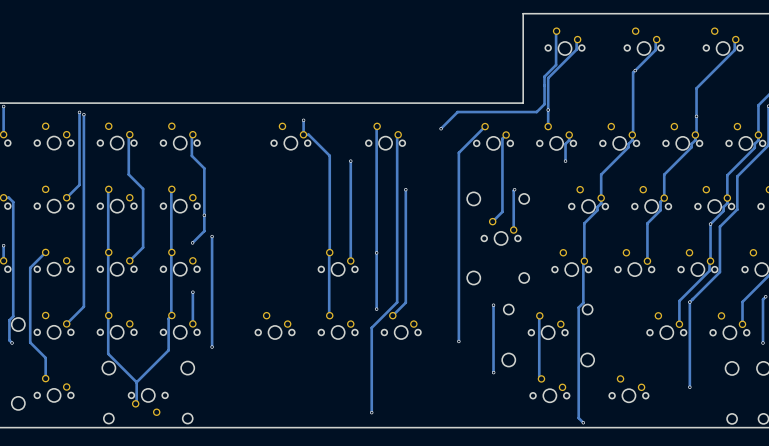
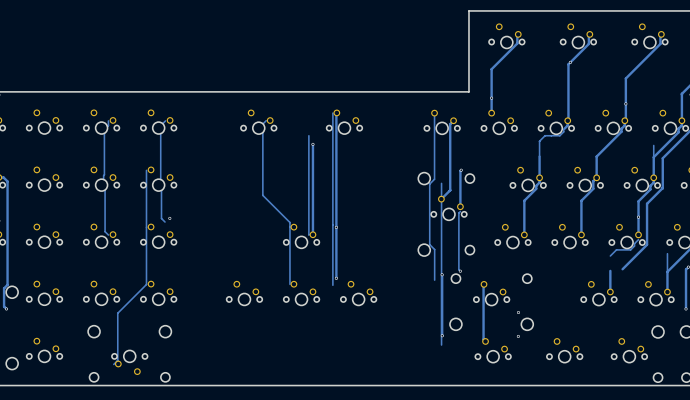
track: (556, 31) (556, 65) (544, 76) (544, 104) (536, 112) (457, 112) (441, 128) -> none
track: (79, 112) (79, 184) (66, 197) -> none
via: (79, 112) -> none
track: (83, 114) (83, 306) (66, 323) -> none
via: (83, 114) -> none
track: (303, 120) (303, 134) (308, 134) (329, 155) (329, 315) -> none
via: (303, 120) -> none
track: none -> (332, 113) (332, 285)
track: (485, 126) (458, 152) (458, 341) -> (434, 113) (434, 179) (429, 184) (429, 244) (434, 249) (434, 280)
via: (441, 128) -> none
track: (129, 134) (128, 174) (143, 188) (143, 247) (129, 260) -> none
track: (192, 134) (191, 155) (204, 168) (204, 231) (192, 242) -> none
track: none -> (266, 120) (262, 124) (262, 195) (289, 222) (289, 284)
track: (398, 134) (397, 302) (371, 327) (371, 412) -> none
track: none -> (108, 120) (108, 125) (104, 129) (103, 175) (105, 231) (108, 235)
track: none -> (165, 120) (162, 124) (160, 132) (161, 218) (165, 222)
track: (569, 135) (569, 140) (565, 143) (565, 161) -> none
track: (628, 143) (628, 147) (601, 174) -> (539, 141) (539, 156)
track: none -> (563, 129) (559, 135) (545, 135) (539, 141)
track: none -> (308, 135) (309, 234)
via: (565, 161) -> none
track: none -> (653, 145) (653, 157)
track: (108, 189) (108, 353) (136, 382) -> none
track: none -> (146, 170) (146, 284) (117, 313) (117, 360) (113, 364)
track: (171, 189) (171, 315) (168, 318) (168, 350) (136, 382) (135, 403) -> none
track: (405, 189) (405, 302) (392, 315) -> none
via: (405, 189) -> none
track: none -> (441, 183) (441, 345)
via: (204, 215) -> none
via position: (710, 224) -> (638, 217)
track: none -> (460, 211) (458, 213) (460, 271)
track: (212, 236) (212, 347) -> none
via: (212, 236) -> none
track: (45, 252) (30, 267) (30, 342) (45, 357) (45, 378) -> none
track: (710, 261) (709, 270) (679, 300) -> none
track: (583, 262) (583, 302) (578, 307) (578, 418) (583, 422) -> none
track: none -> (638, 239) (630, 249) (616, 249) (610, 256)
track: none -> (667, 253) (667, 271)
track: (192, 292) (192, 323) -> none
via: (192, 292) -> none
track: (692, 299) (689, 302) (689, 387) -> none
via: none -> (460, 271)
via: (689, 302) -> none
via: (458, 341) -> none
via: none -> (518, 312)
via: (212, 347) -> none
via: none -> (518, 336)
via: (689, 387) -> none
part: none -> (629, 350)
via: (371, 412) -> none
via: (583, 422) -> none

